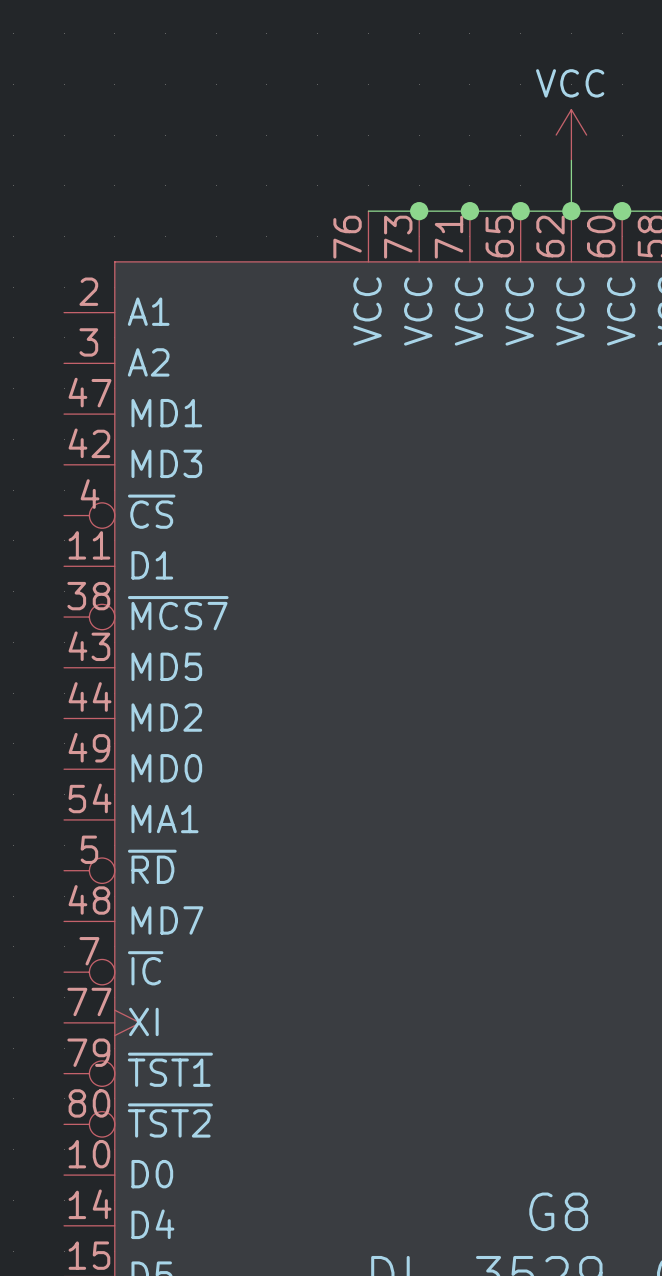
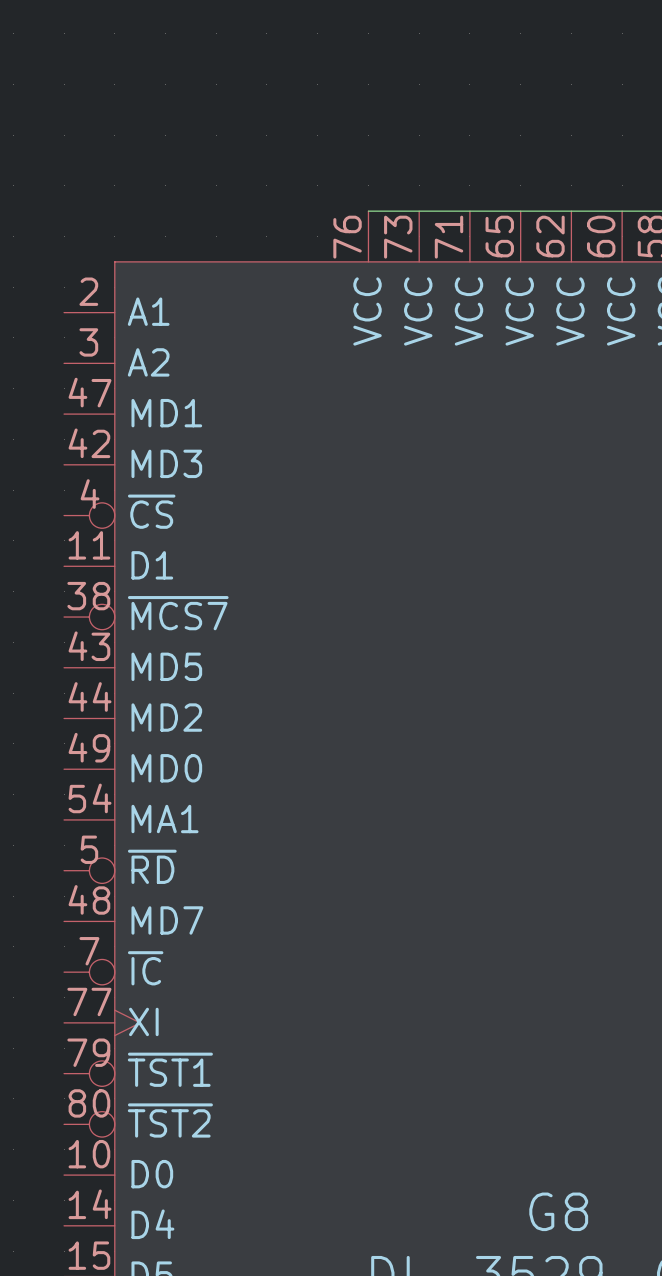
power symbol: VCC (571, 135) -> none
wire: (571, 160) (571, 211) -> none
junction: (419, 211) -> none
junction: (469, 211) -> none
junction: (520, 211) -> none
junction: (571, 211) -> none
junction: (622, 211) -> none

